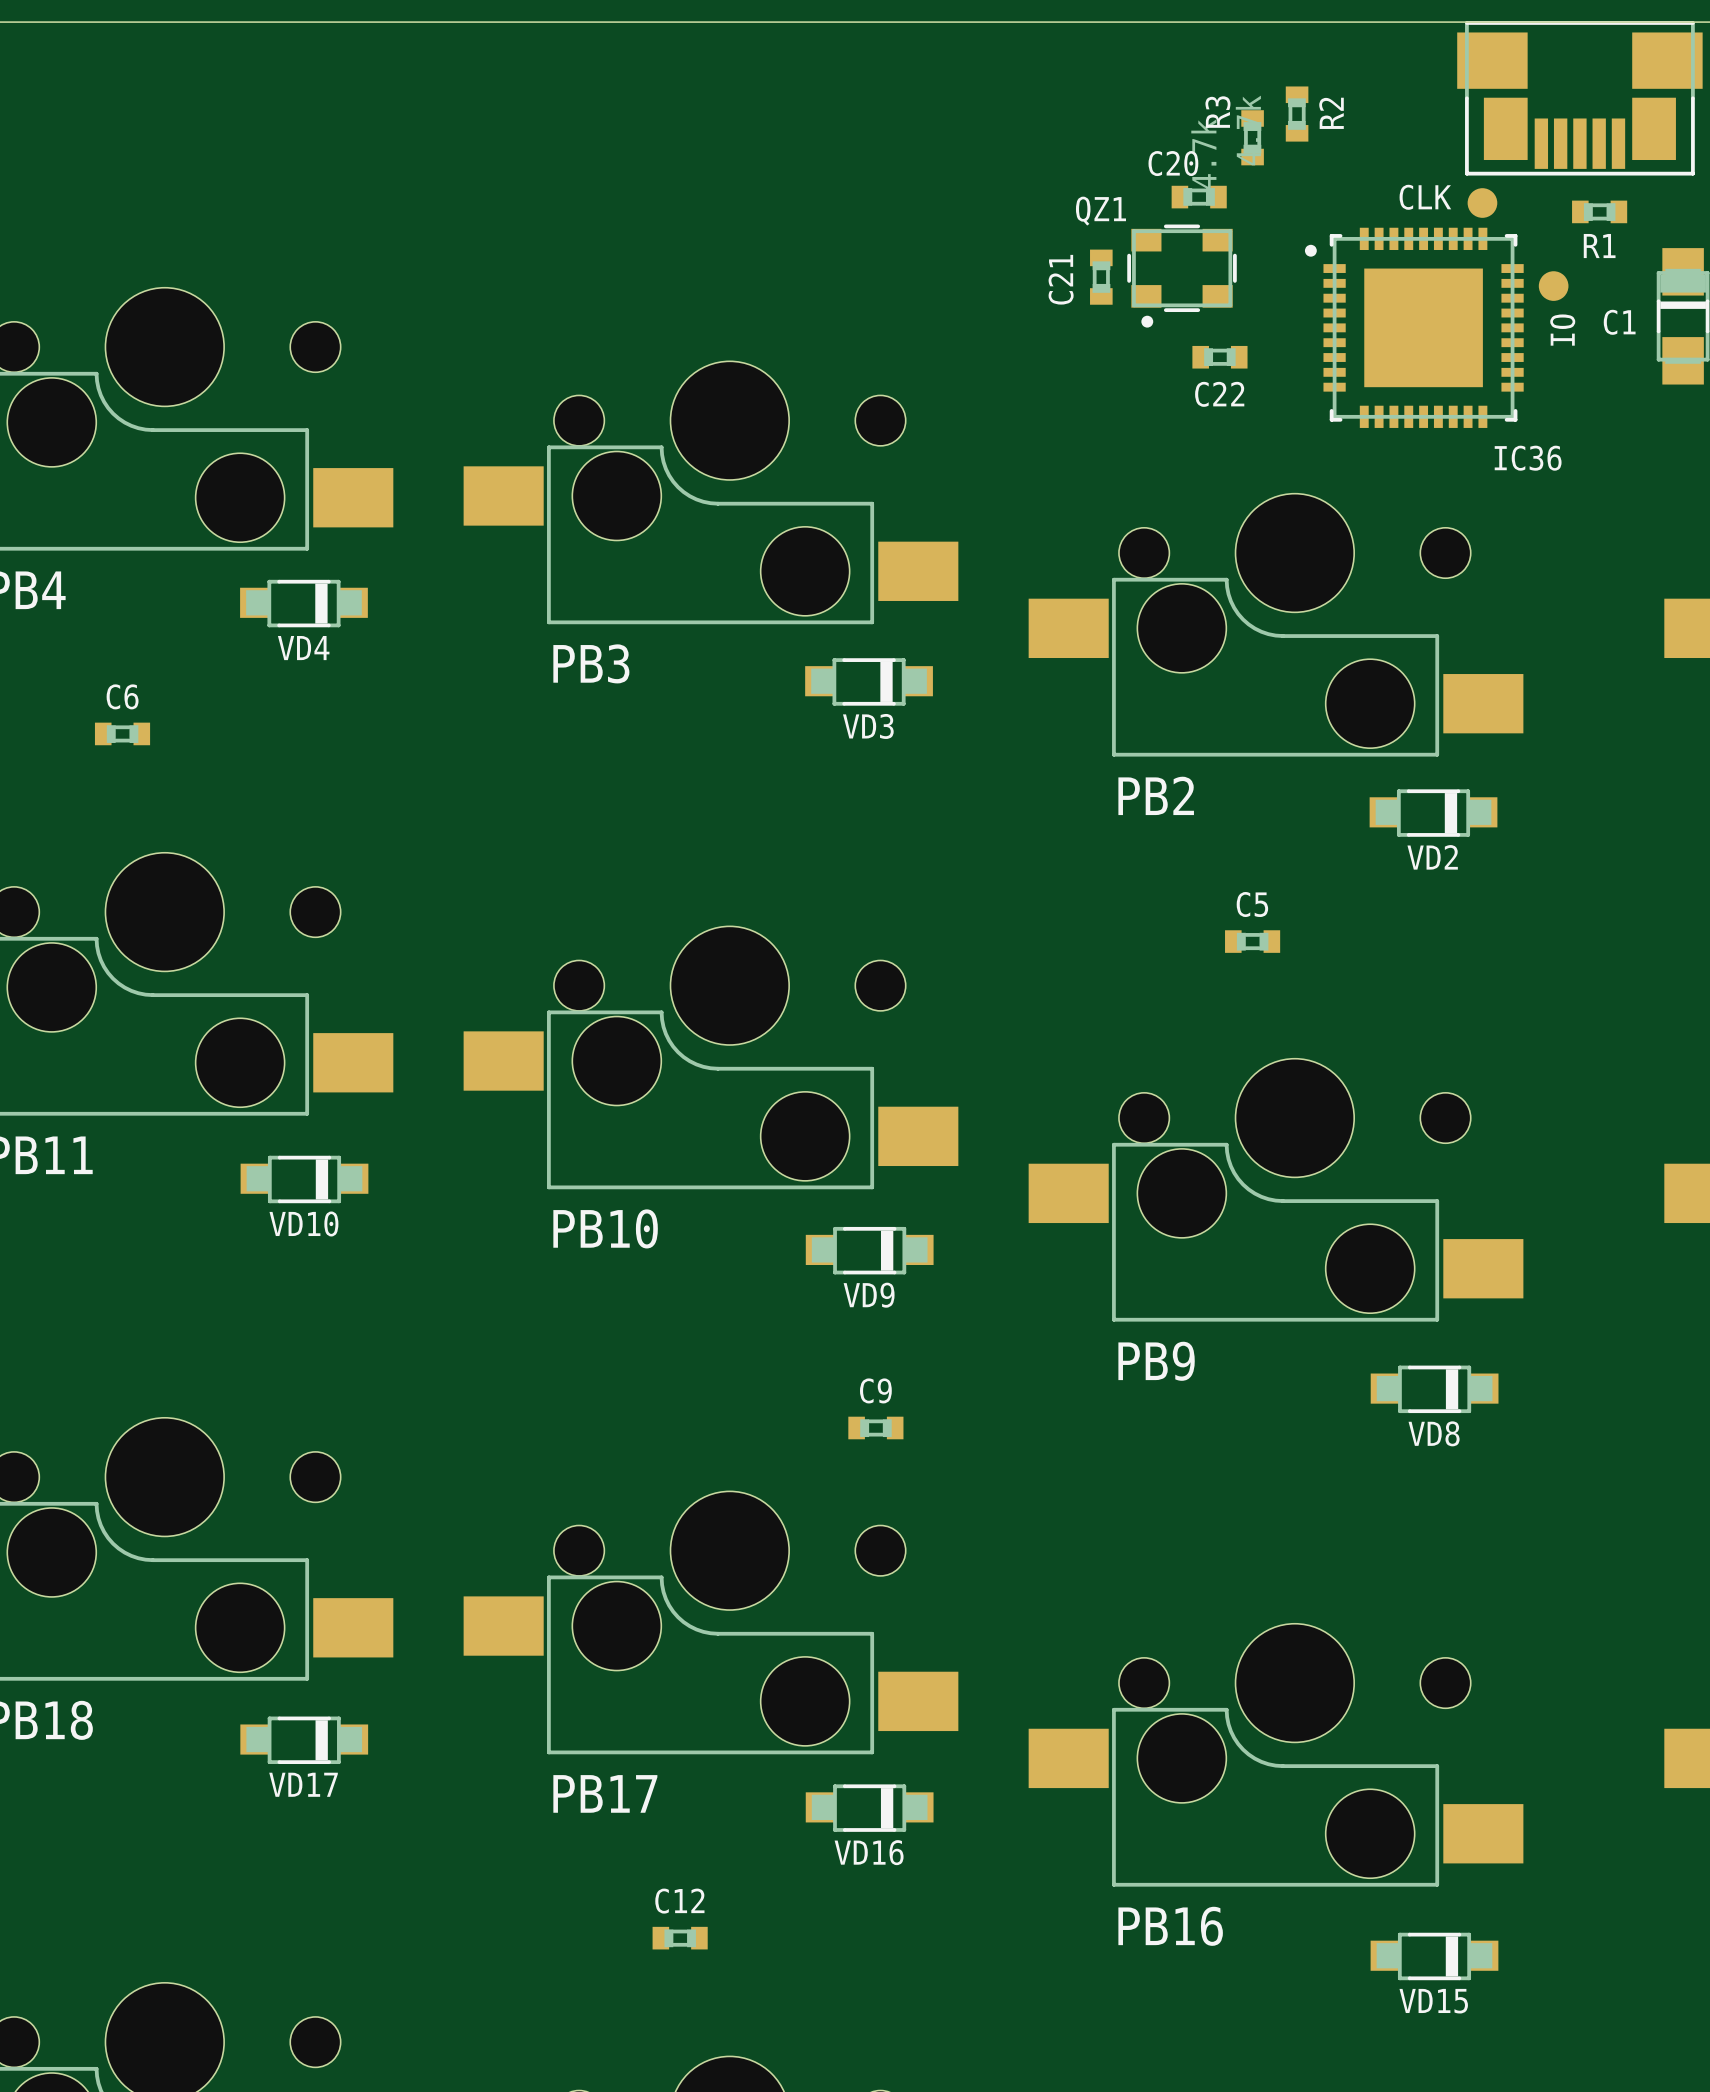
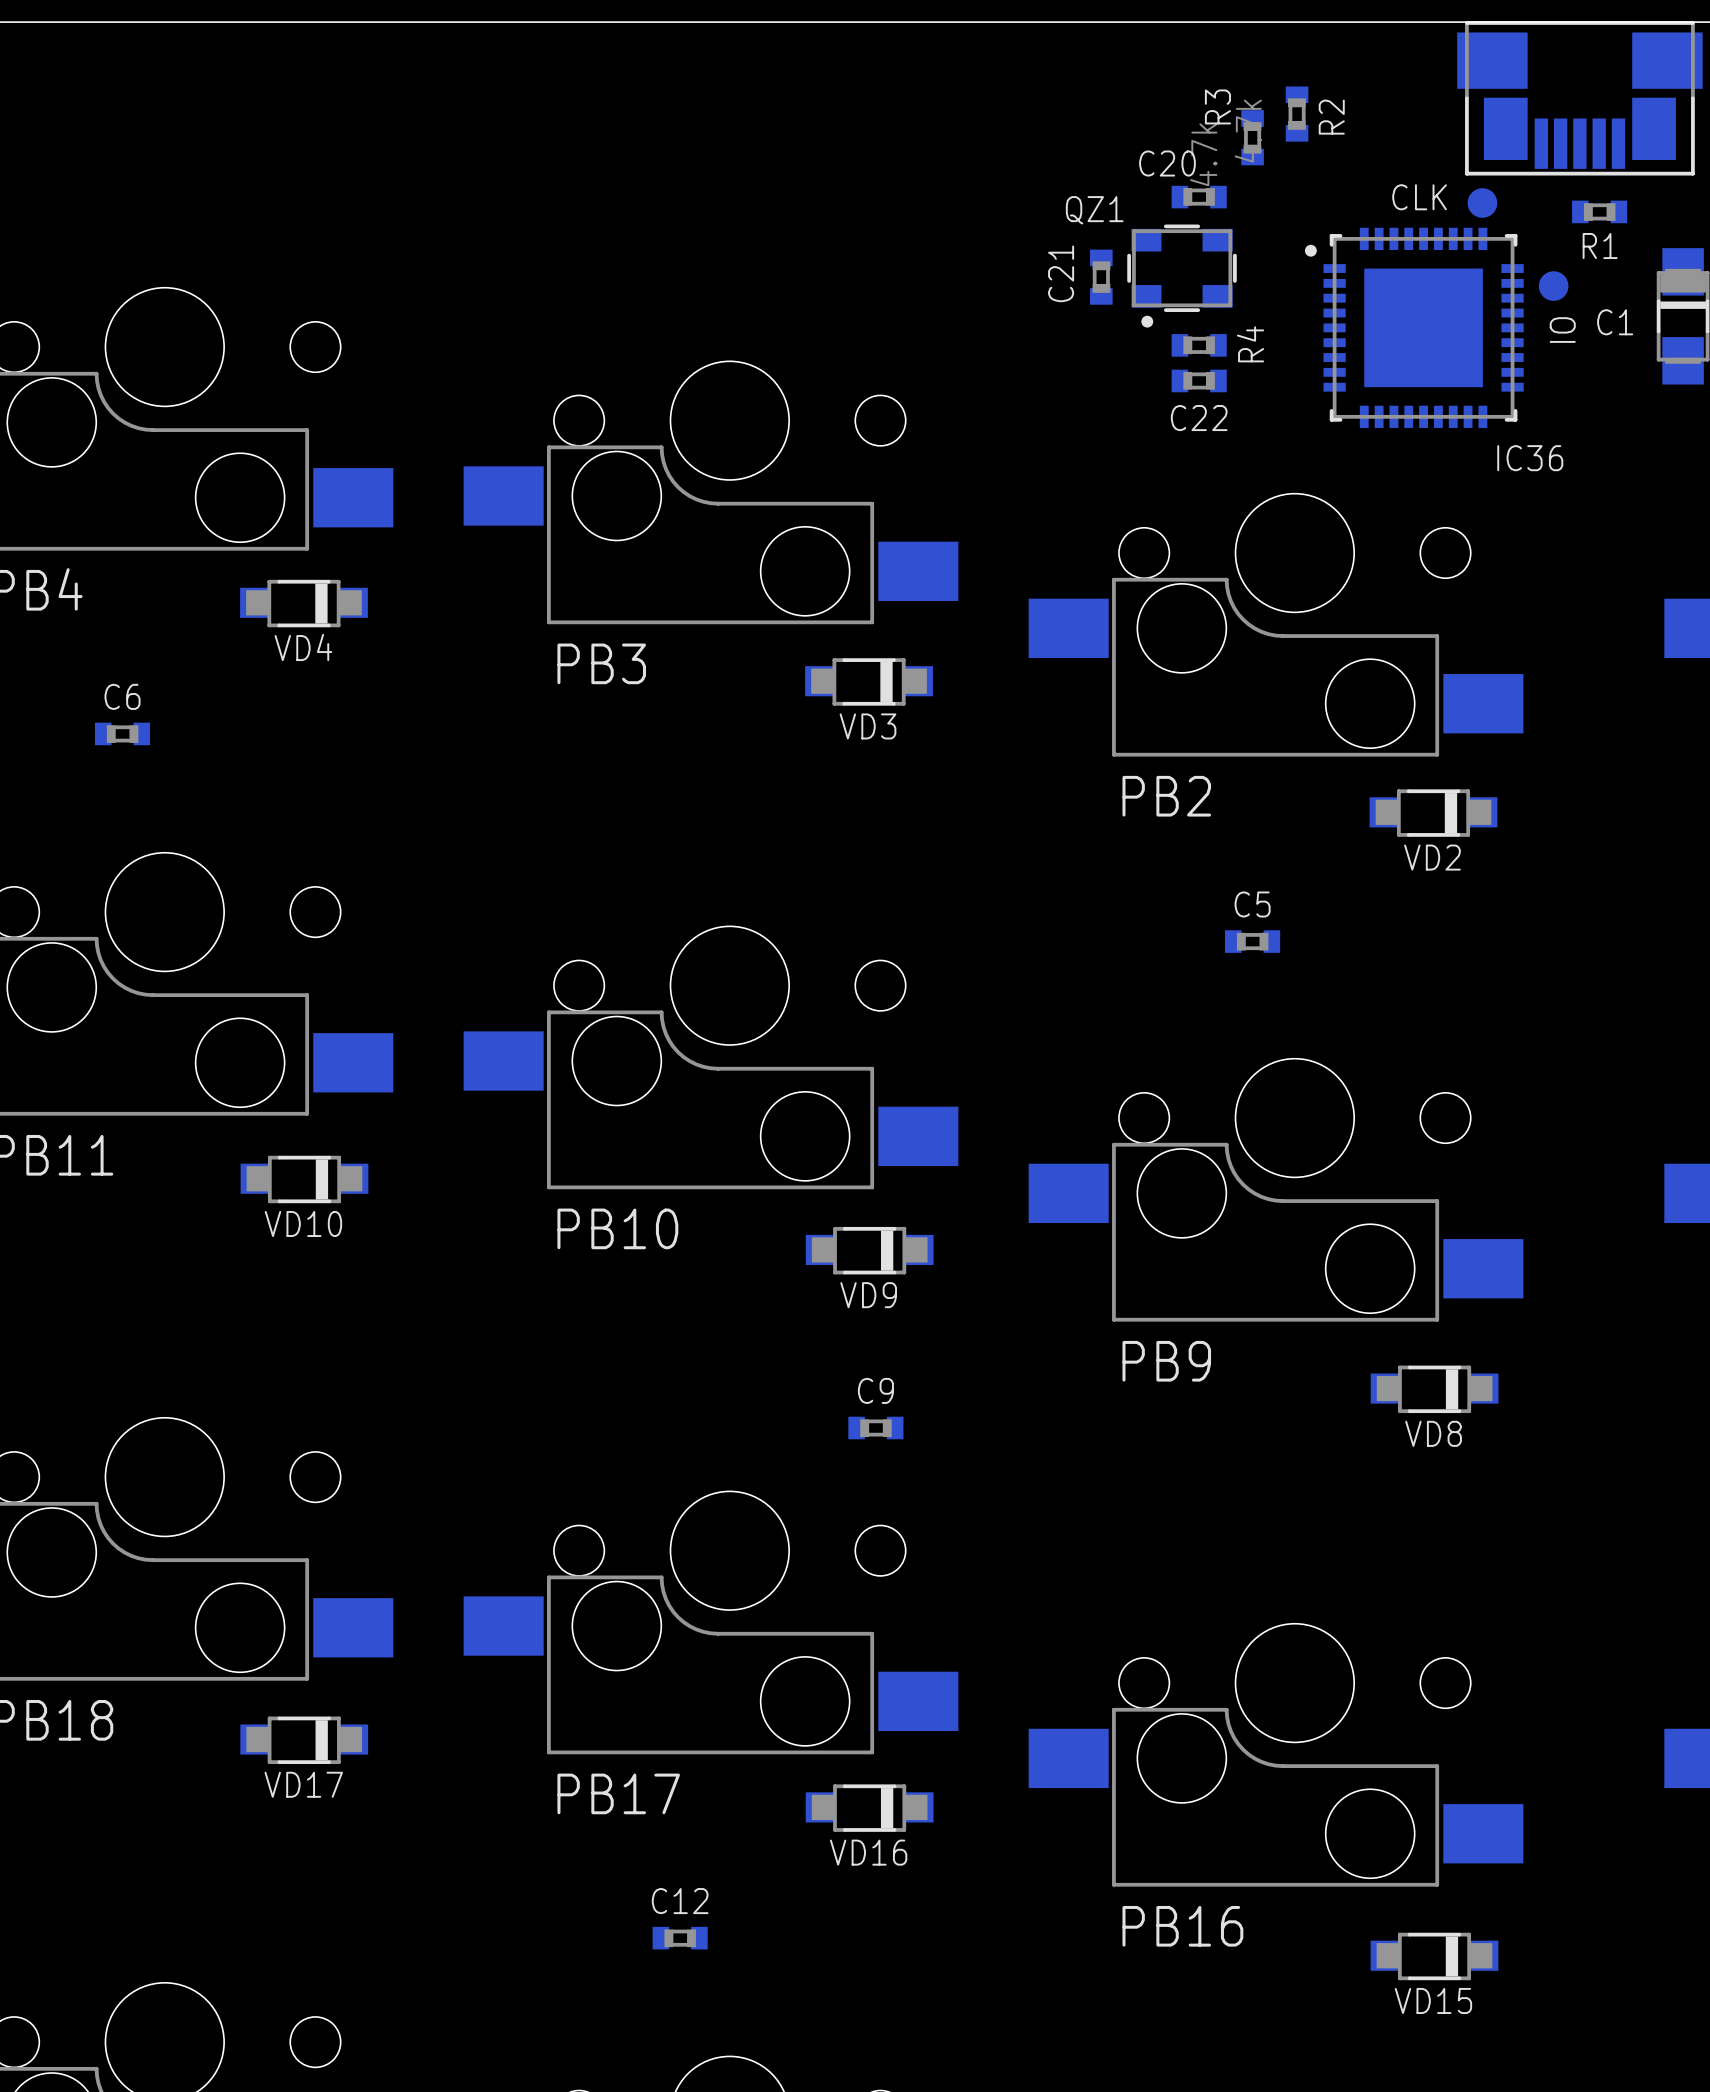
R4: none -> (1199, 345)
C22 position: (1219, 357) -> (1199, 380)

